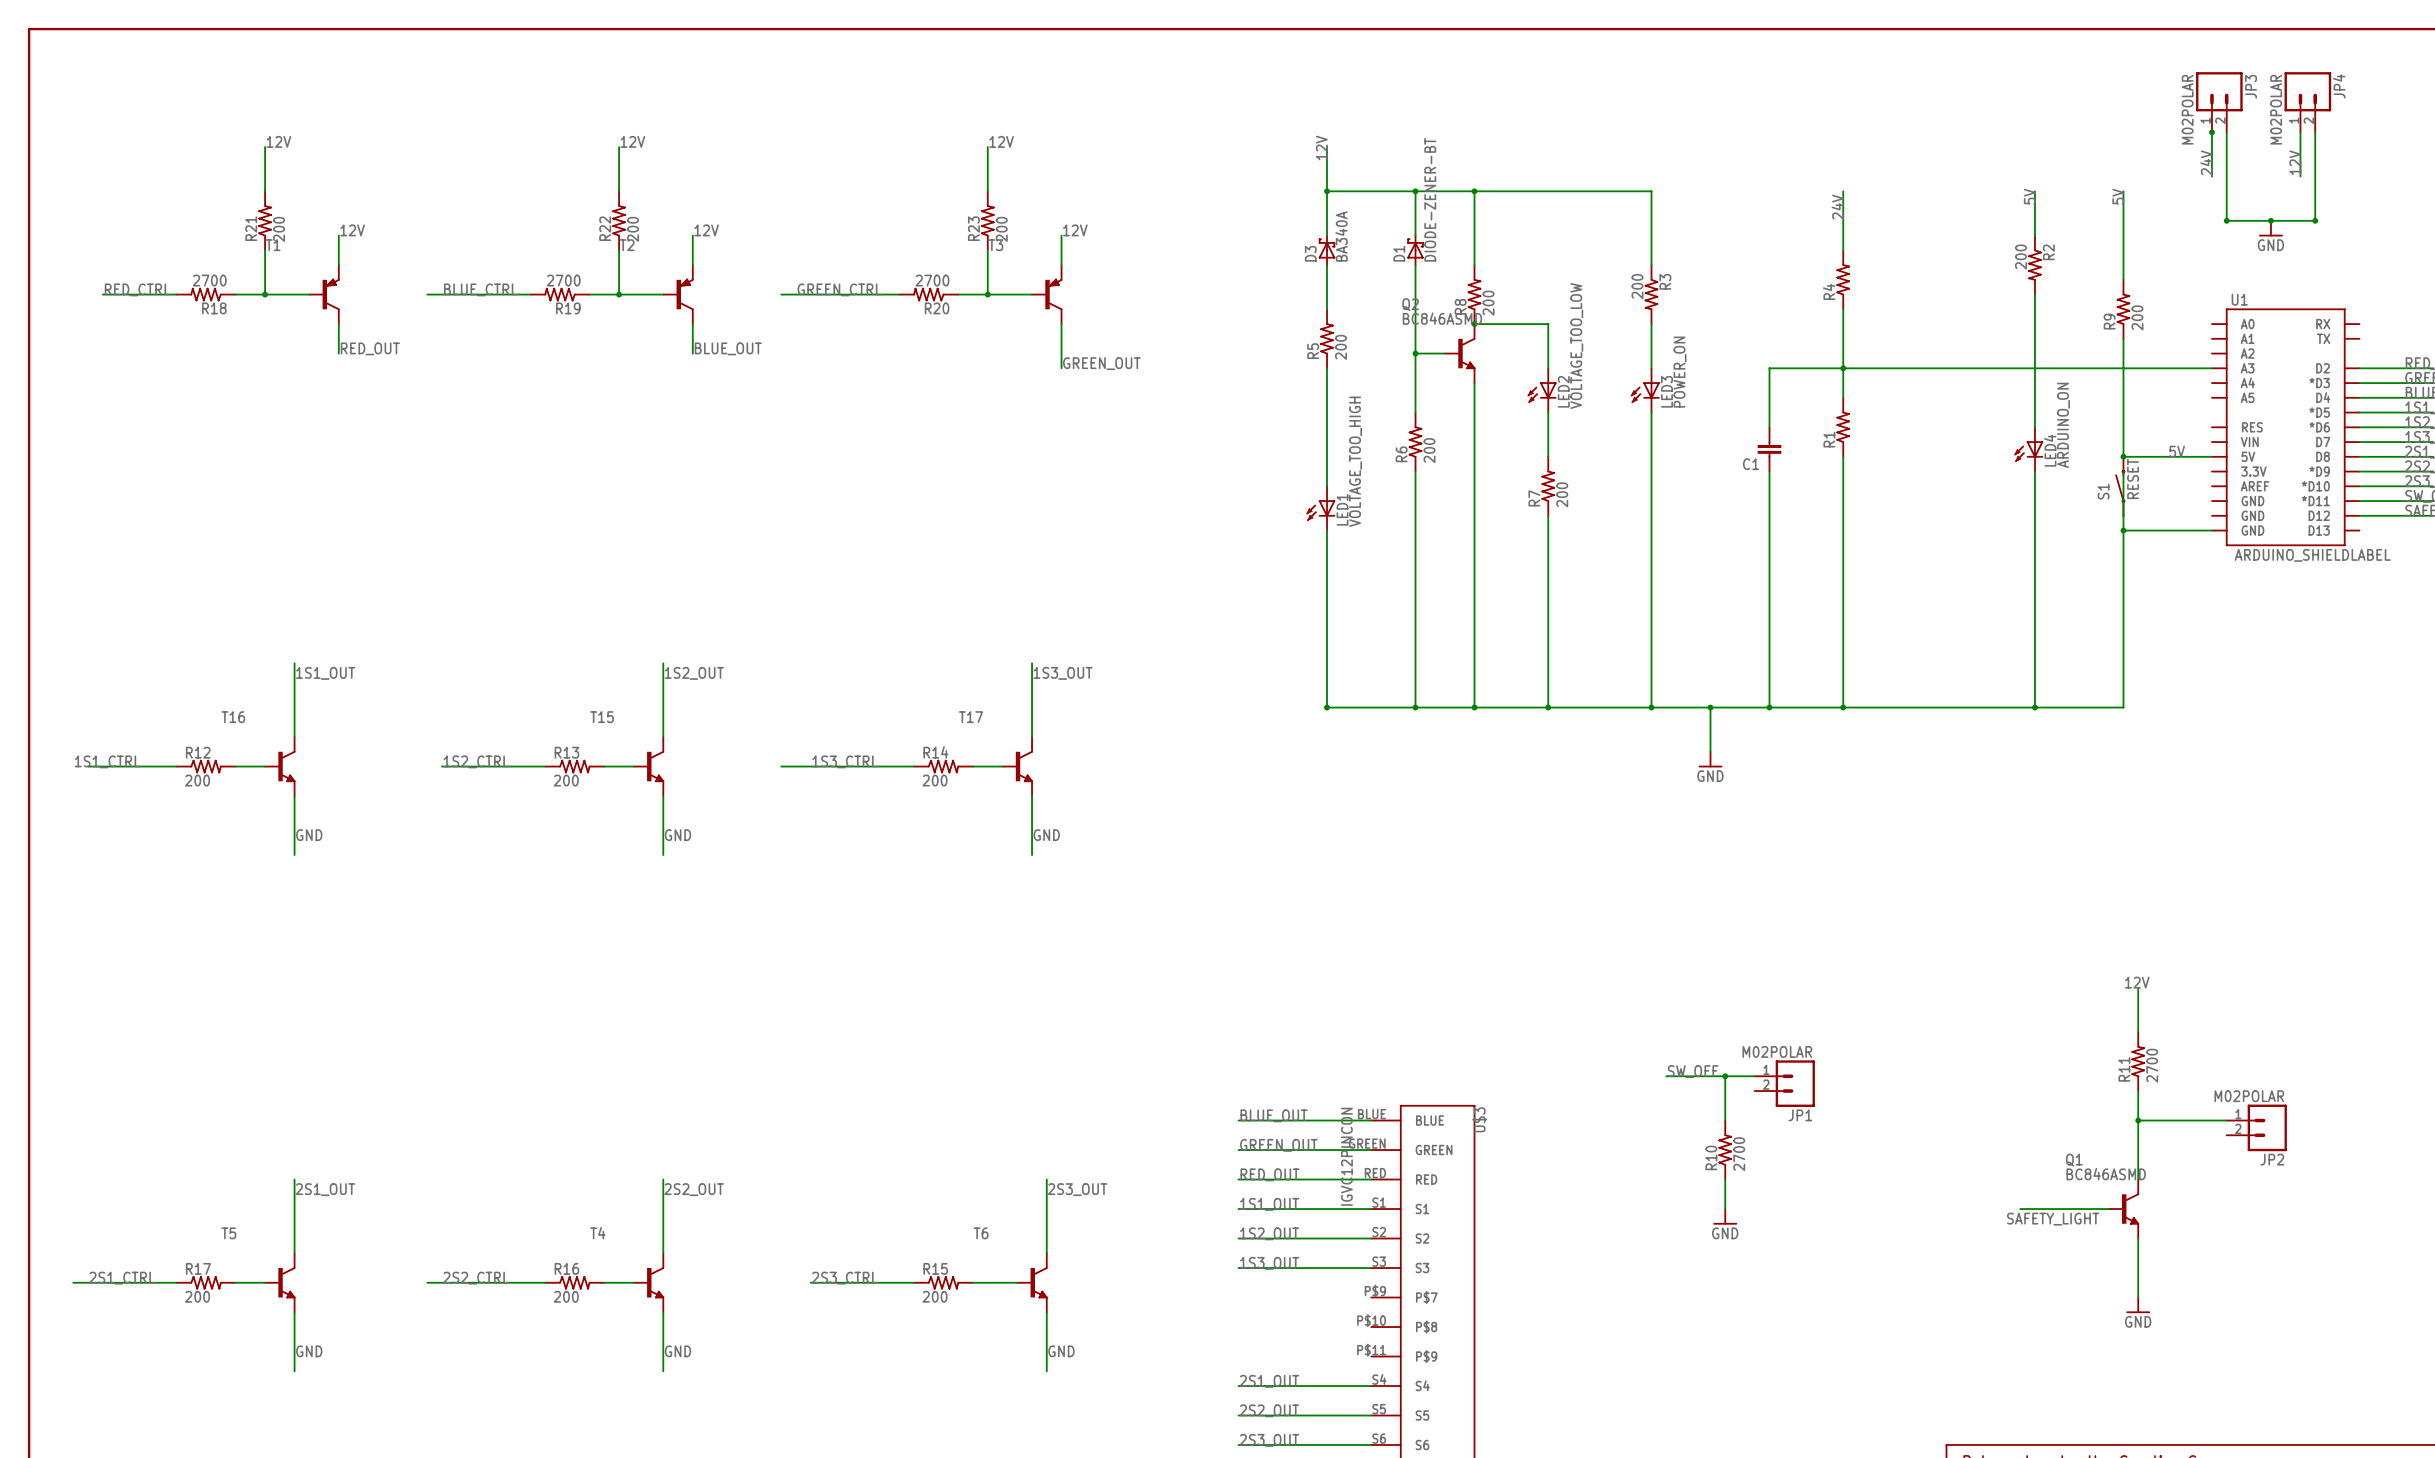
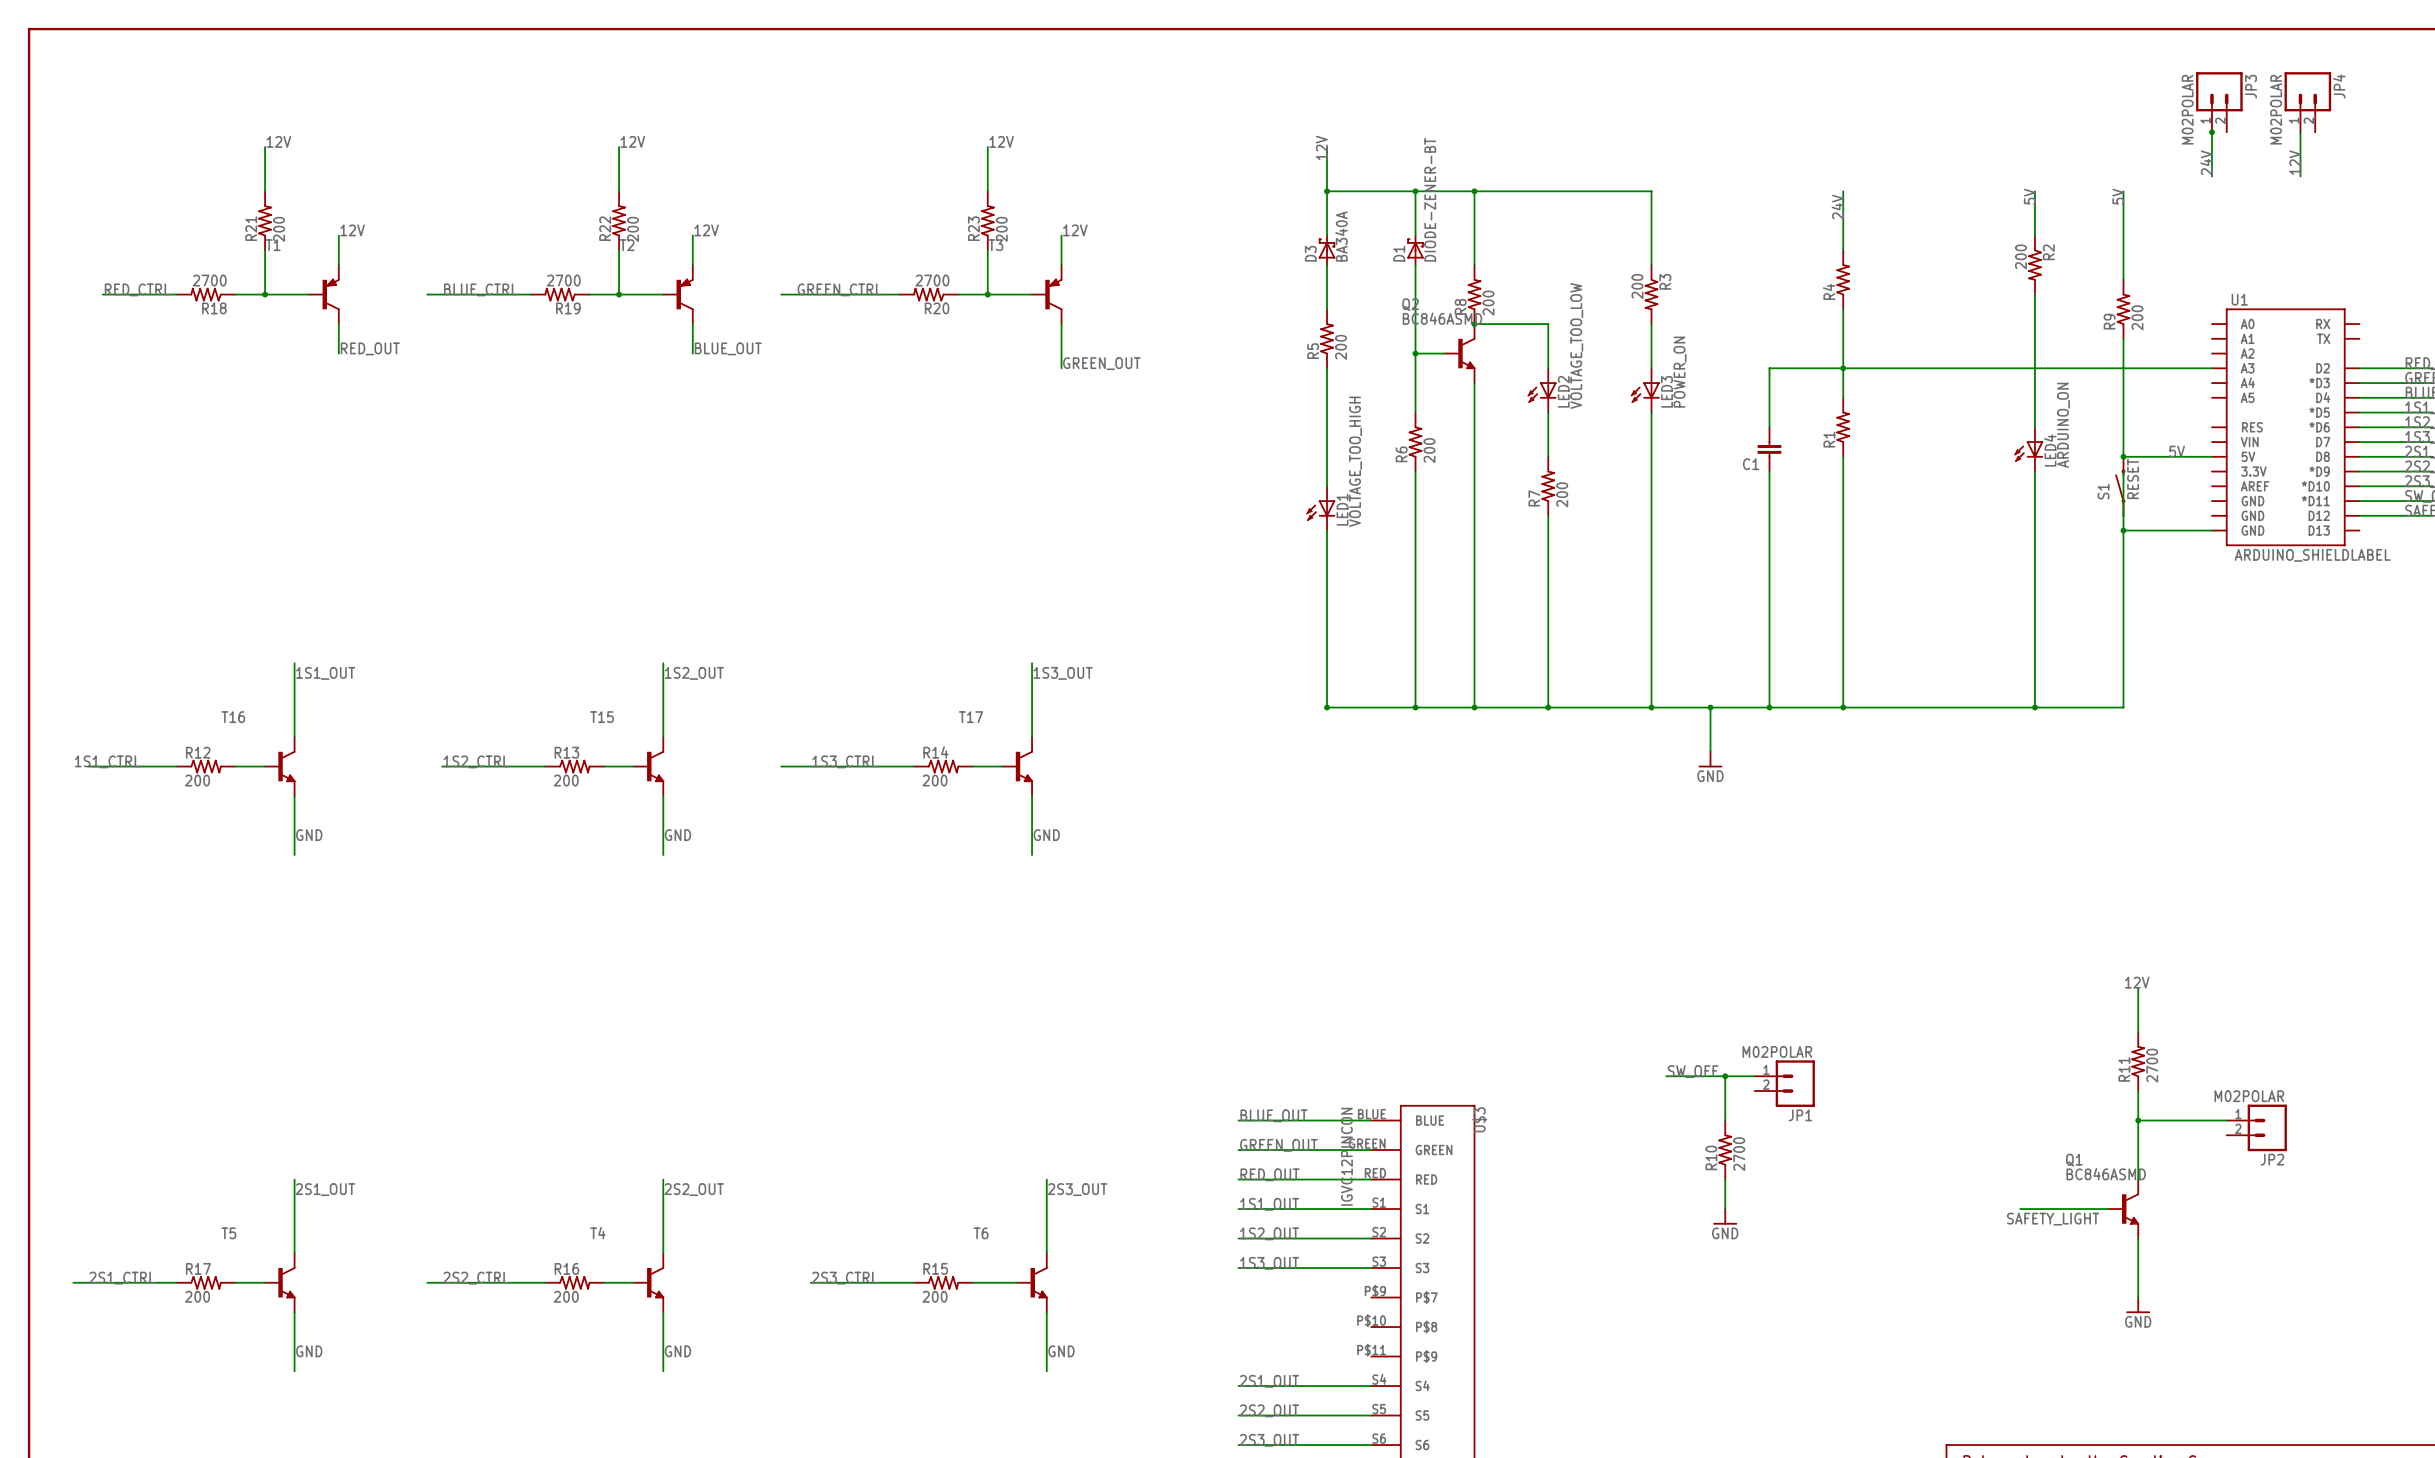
wire: (2226, 132) (2226, 220) (2315, 220) (2315, 132) -> none
junction: (2226, 220) -> none
junction: (2270, 220) -> none
junction: (2315, 220) -> none
power symbol: GND (2270, 228) -> none

